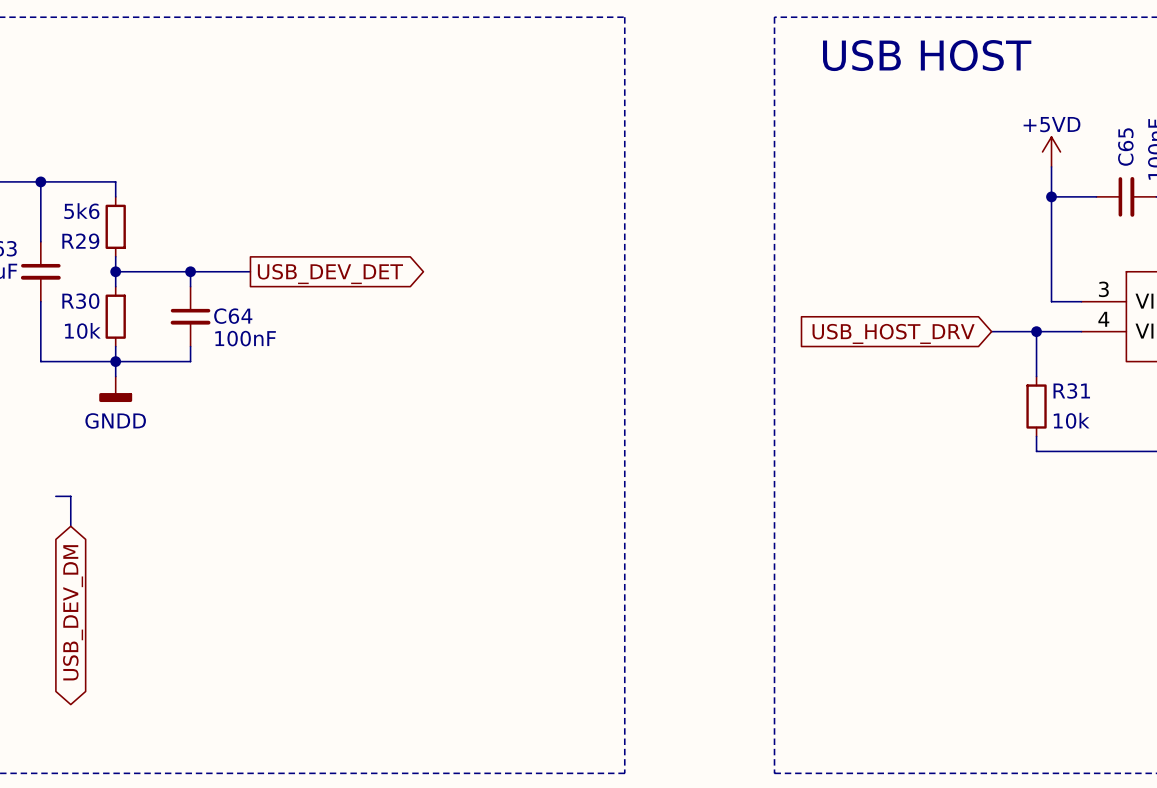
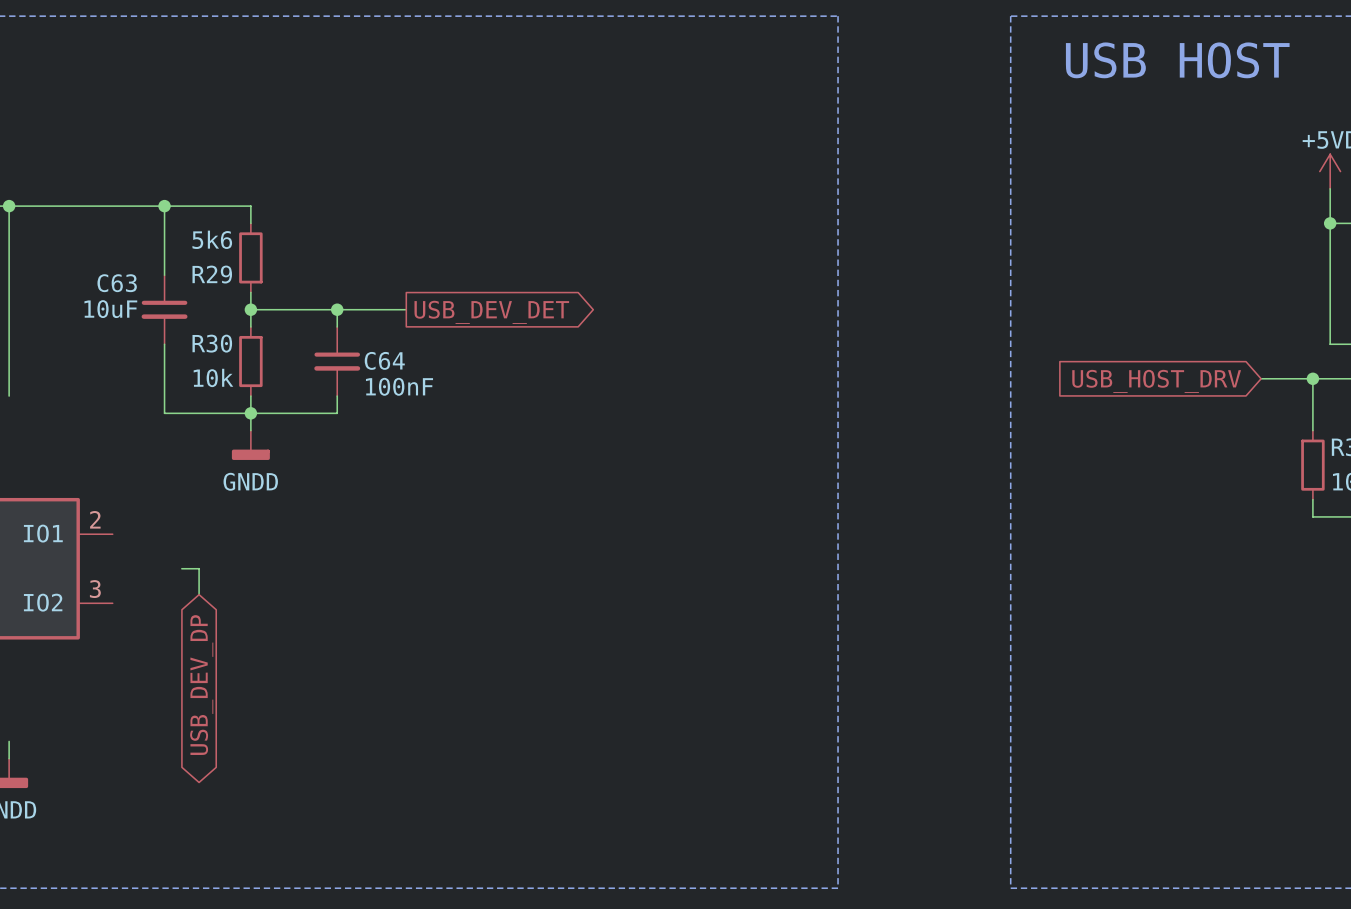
wire: (70, 518) (70, 526) -> none
global label: USB_DEV_DM (73, 612) -> USB_DEV_DP (201, 685)

